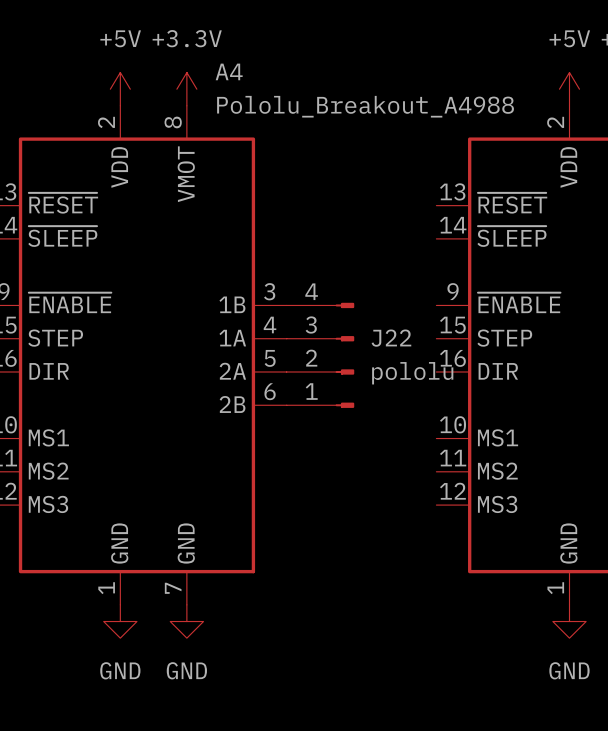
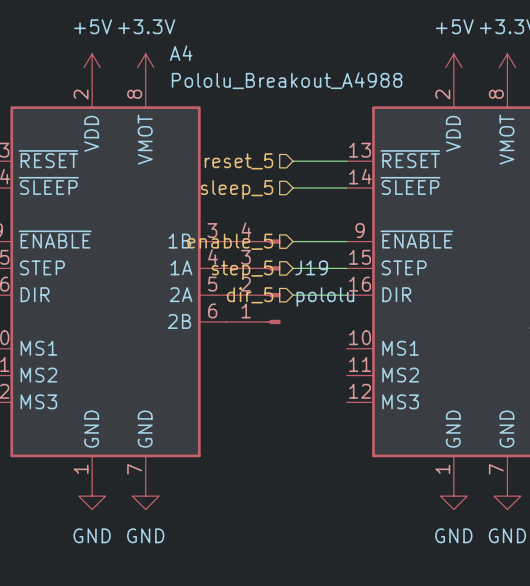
wire: none -> (293, 161) (346, 161)
hierarchical label: none -> reset_5 (238, 161)
wire: none -> (293, 188) (346, 188)
hierarchical label: none -> sleep_5 (237, 189)
wire: none -> (293, 241) (346, 241)
hierarchical label: none -> enable_5 (230, 241)
wire: none -> (293, 268) (346, 268)
J22 name: J22 (391, 338) -> J19 (311, 267)
hierarchical label: none -> step_5 (242, 270)
wire: none -> (293, 295) (346, 295)
hierarchical label: none -> dir_5 (250, 295)

